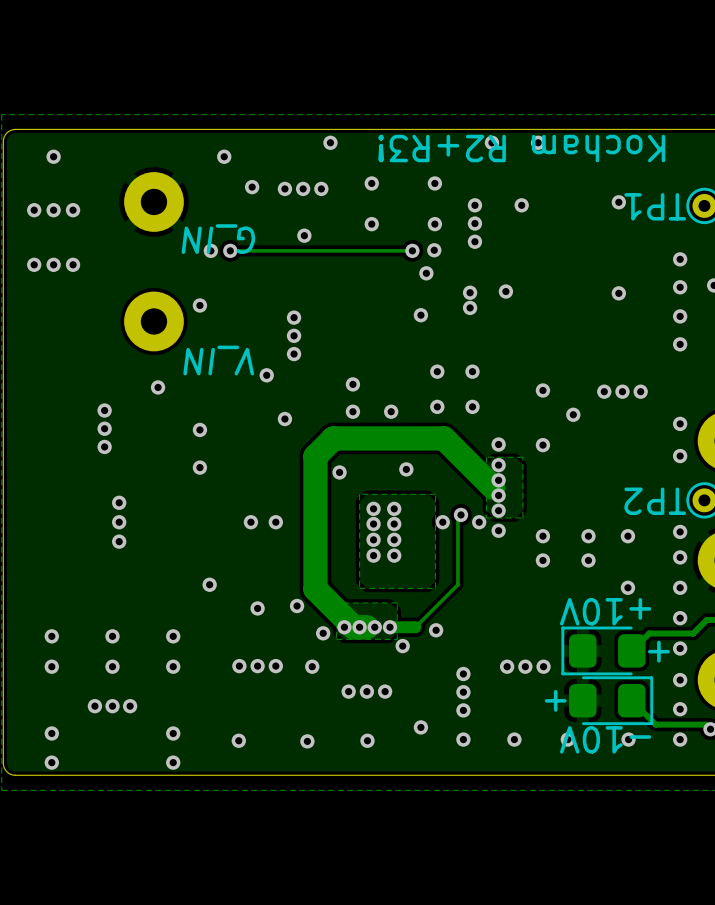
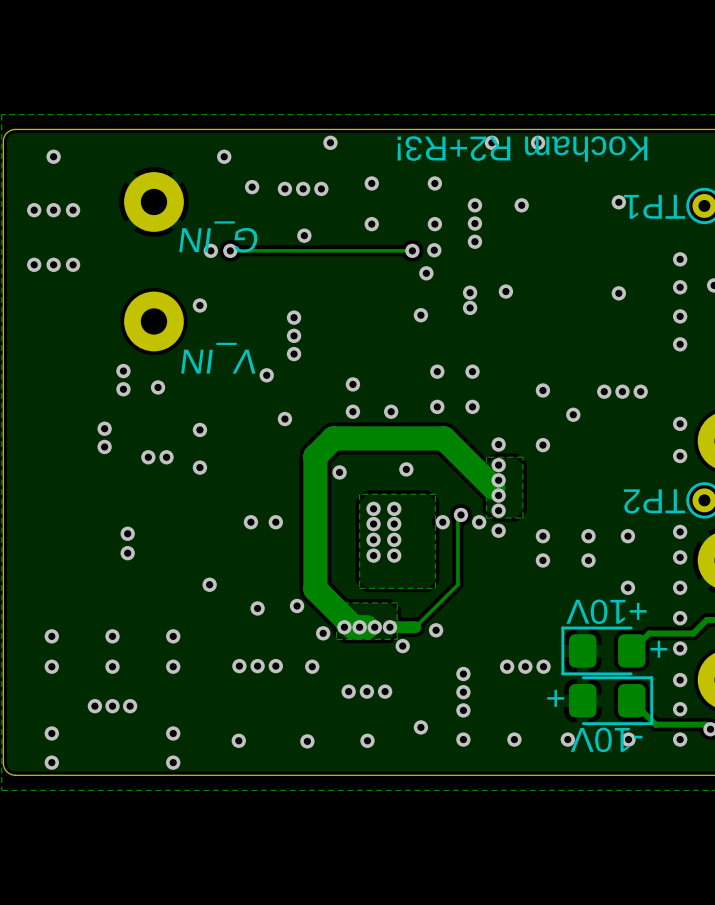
via: none -> (123, 371)
via: none -> (123, 389)
via: (104, 410) -> none
via: none -> (148, 457)
via: none -> (166, 457)
via: (119, 502) -> none
via: (119, 522) -> none
via: none -> (127, 533)
via: (119, 541) -> none
via: none -> (127, 553)

